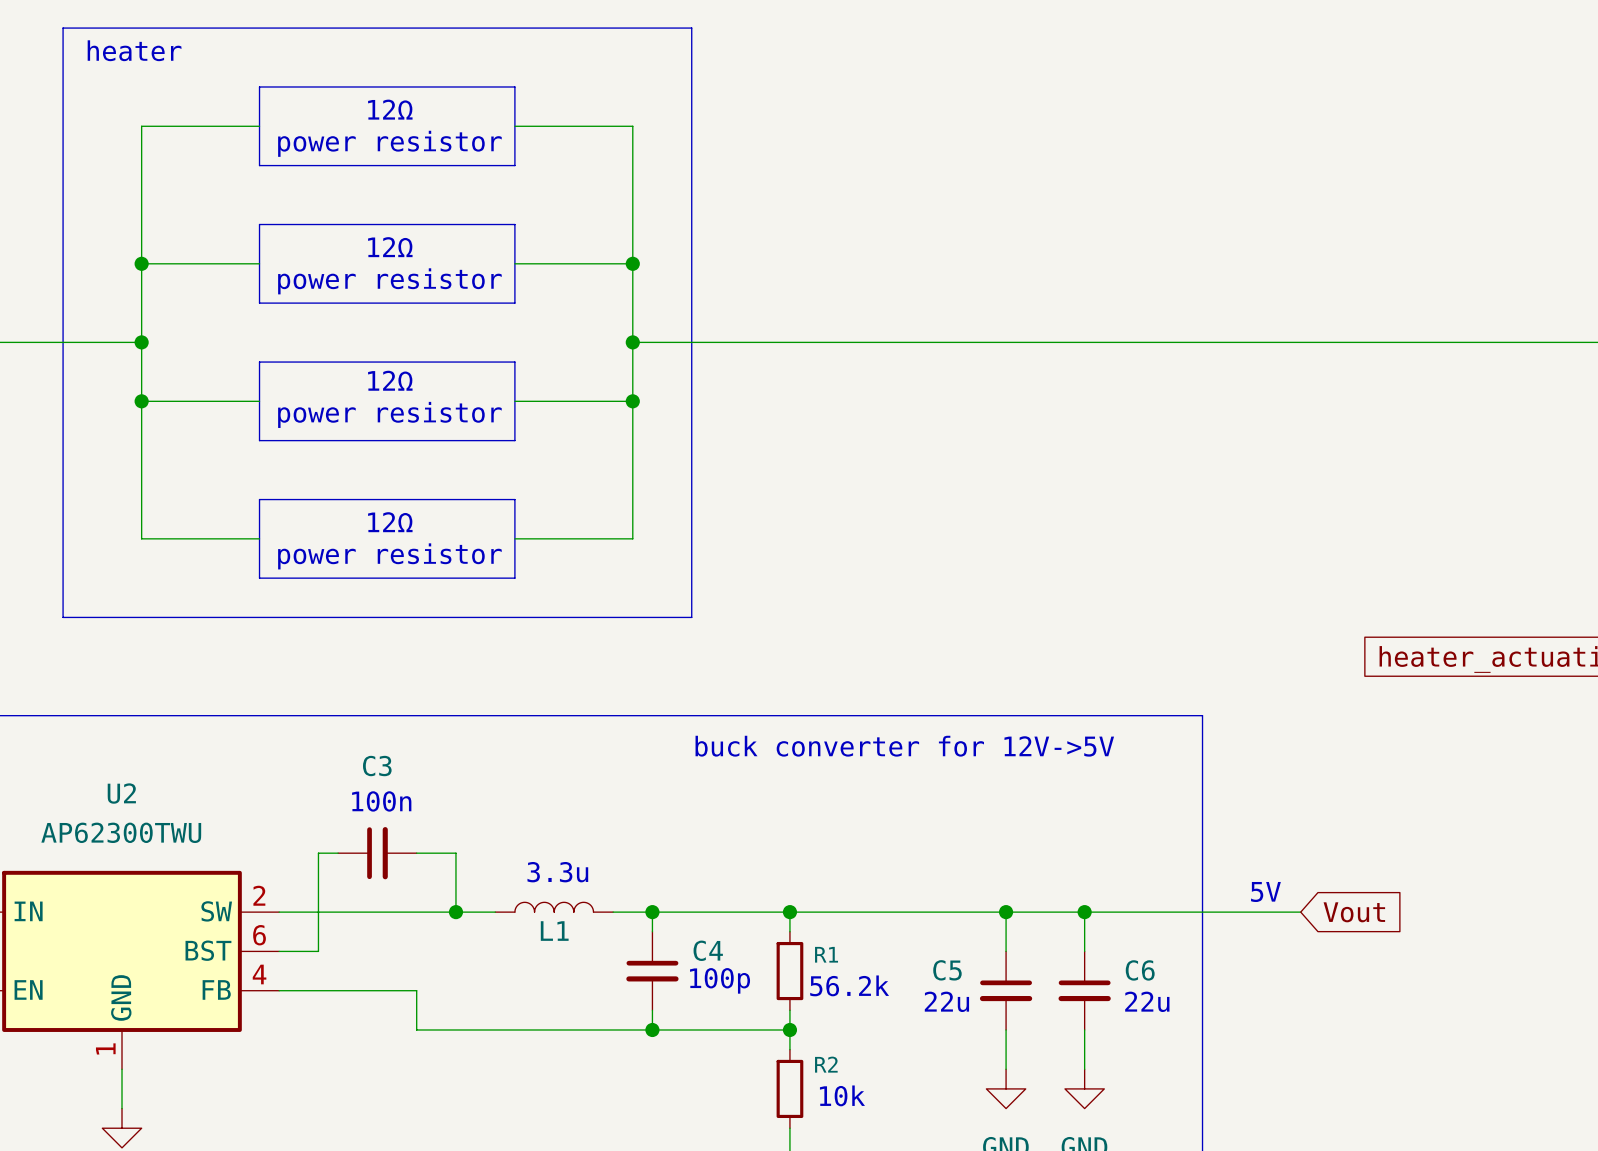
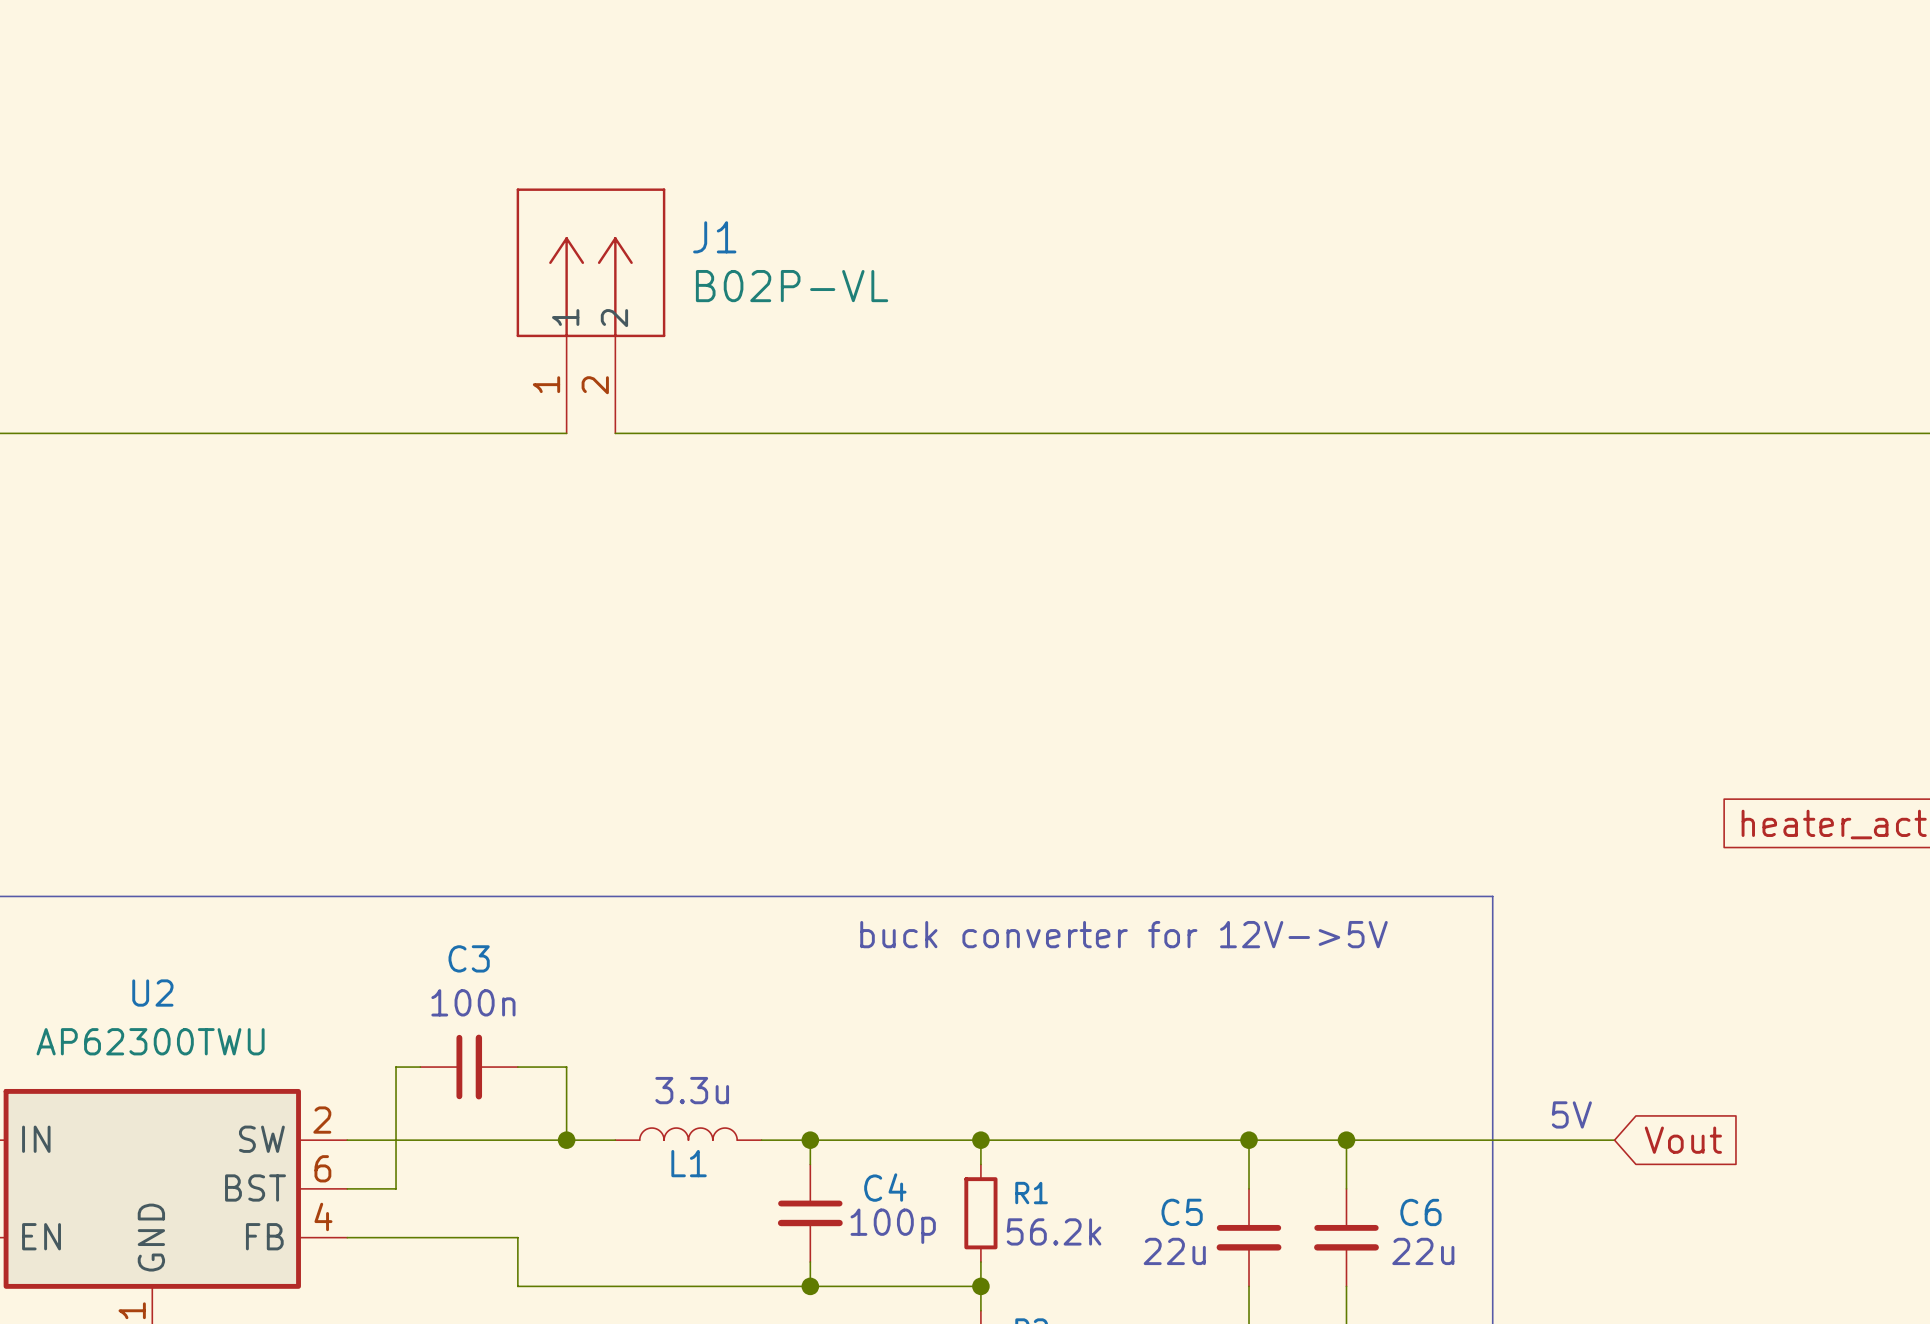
line: (63, 28) (691, 28) (691, 617) (63, 617) (63, 28) -> none
text: heater (134, 50) -> none
line: (259, 86) (259, 165) (514, 165) (514, 86) (259, 86) -> none
text: 12Ω (390, 109) -> none
wire: (259, 126) (141, 126) (141, 538) (259, 538) -> none
wire: (514, 126) (632, 126) (632, 538) (514, 538) -> none
text: power resistor (389, 143) -> none
line: (259, 224) (259, 303) (514, 303) (514, 224) (259, 224) -> none
J1: none -> B02P-VL (590, 310)
text: 12Ω (390, 247) -> none
wire: (141, 263) (259, 263) -> none
junction: (141, 263) -> none
wire: (514, 263) (632, 263) -> none
junction: (632, 263) -> none
text: power resistor (389, 281) -> none
wire: none -> (176, 433) (566, 433)
junction: (141, 342) -> none
wire: none -> (615, 433) (785, 433)
junction: (632, 342) -> none
line: (259, 362) (259, 440) (514, 440) (514, 362) (259, 362) -> none
text: 12Ω (390, 380) -> none
wire: (141, 401) (259, 401) -> none
junction: (141, 401) -> none
wire: (514, 401) (632, 401) -> none
junction: (632, 401) -> none
text: power resistor (389, 414) -> none
line: (259, 499) (514, 499) (514, 578) (259, 578) (259, 499) -> none
text: 12Ω (390, 522) -> none
text: power resistor (389, 556) -> none

